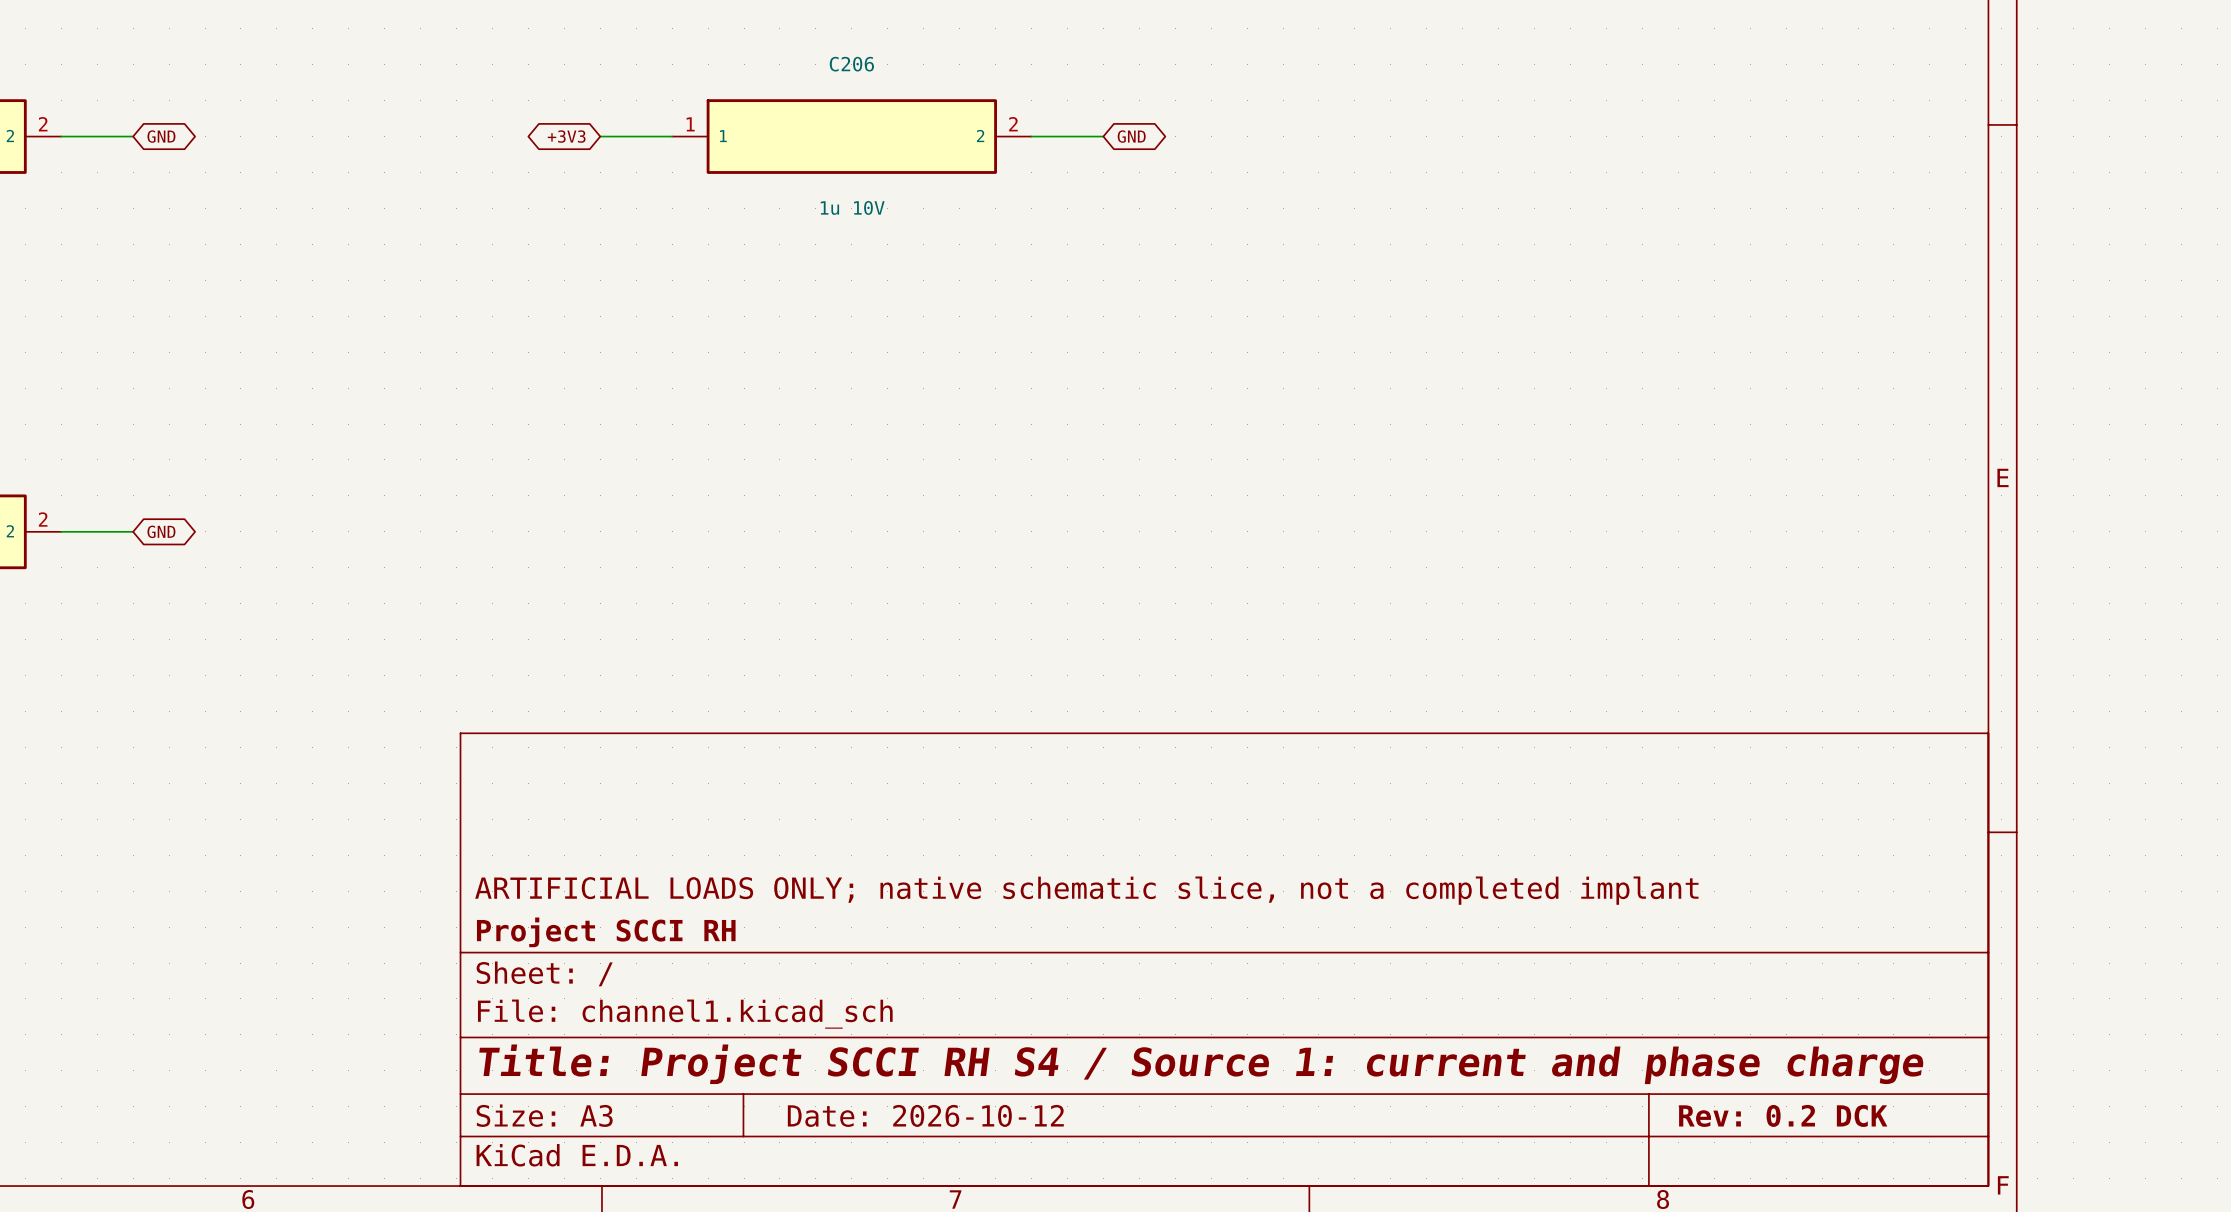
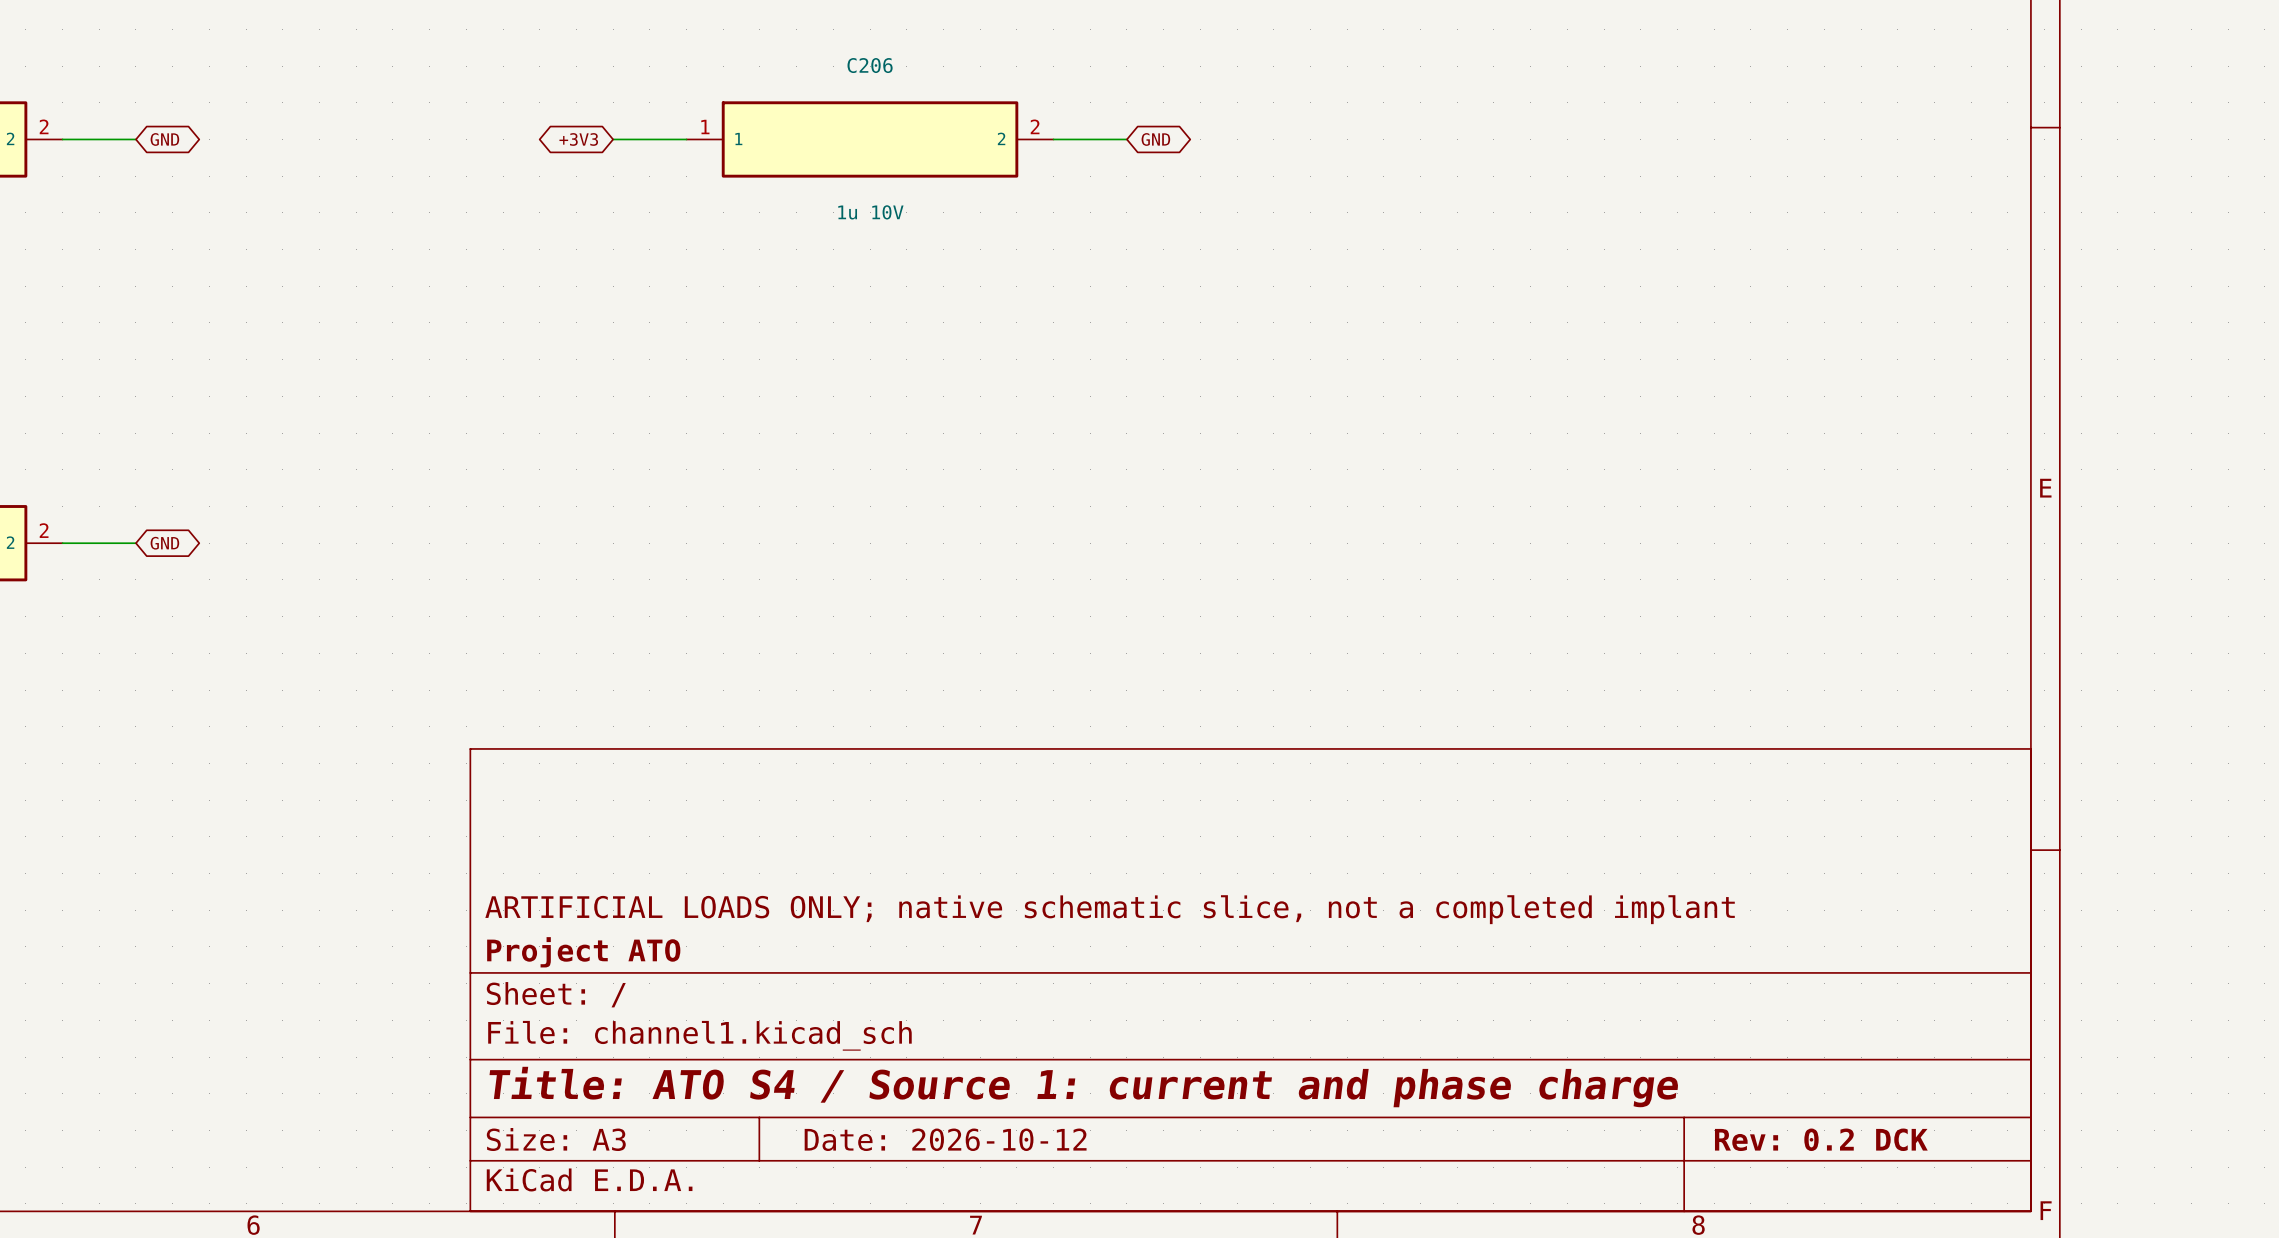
title block: Project SCCI RH (606, 932) -> Project ATO (583, 952)
title block: Title: Project SCCI RH S4 / Source 1: current and phase charge (1201, 1064) -> Title: ATO S4 / Source 1: current and phase charge (1084, 1087)

